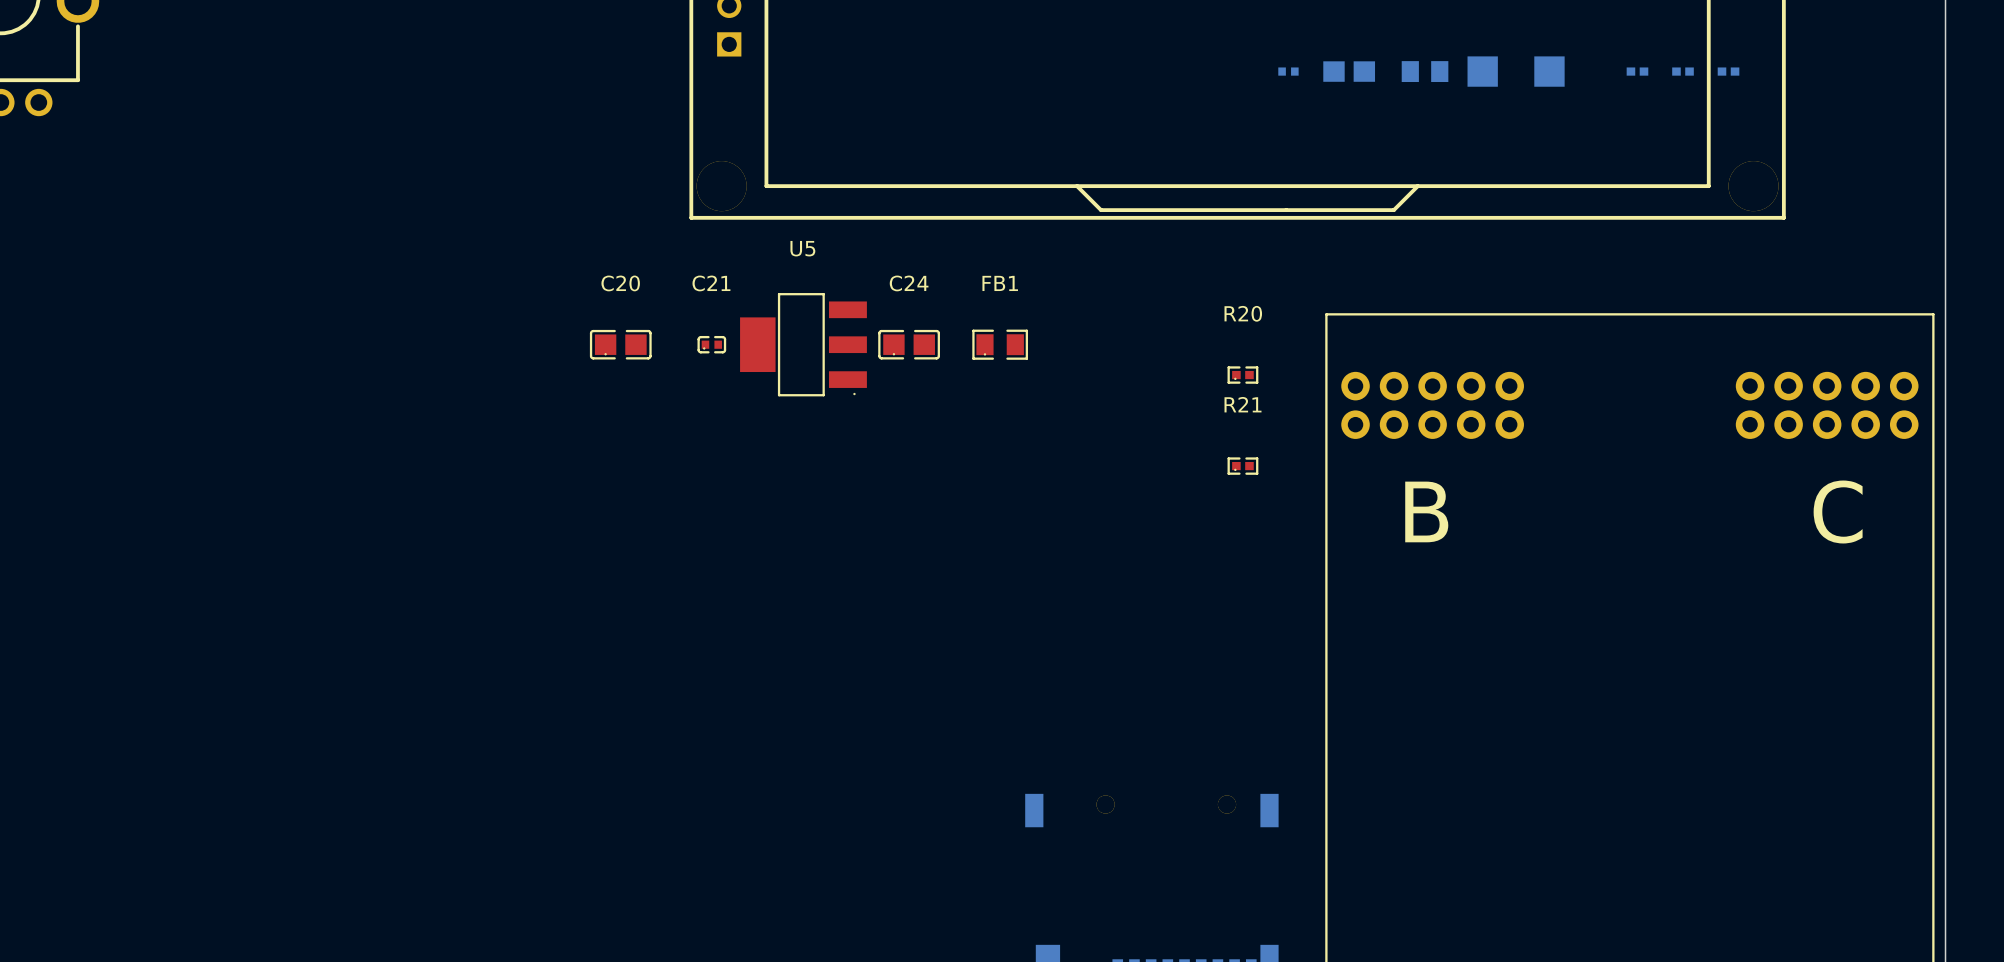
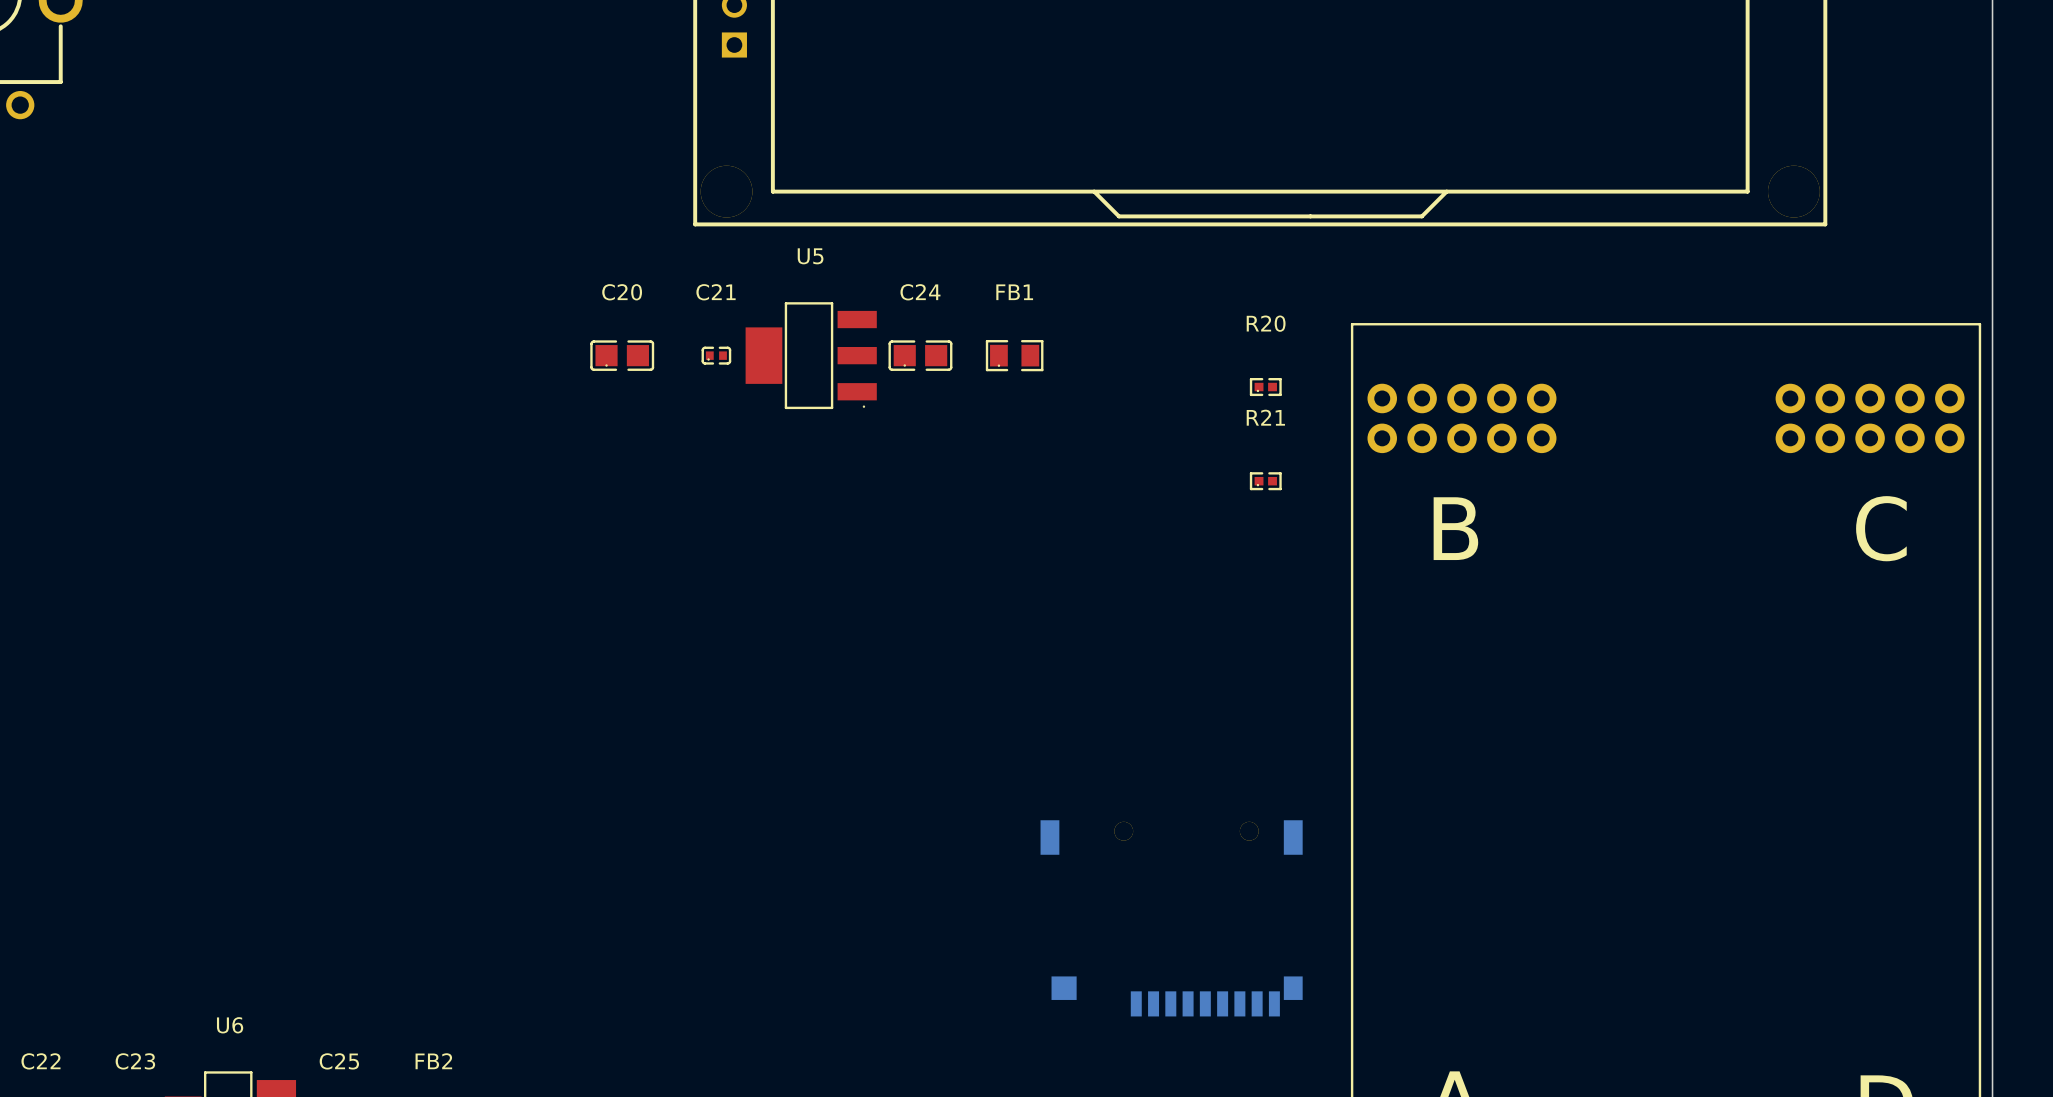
part: (1288, 71) -> none
part: (1349, 71) -> none
part: (1425, 71) -> none
part: (1516, 71) -> none
part: (1637, 71) -> none
part: (1683, 71) -> none
part: (1728, 71) -> none

